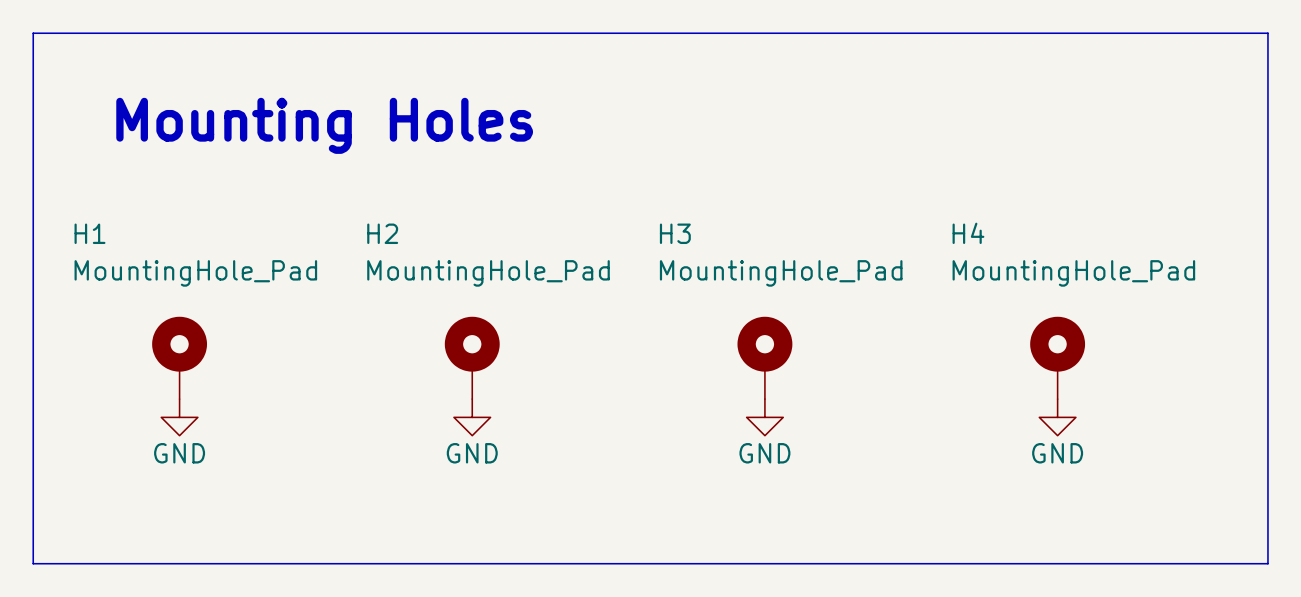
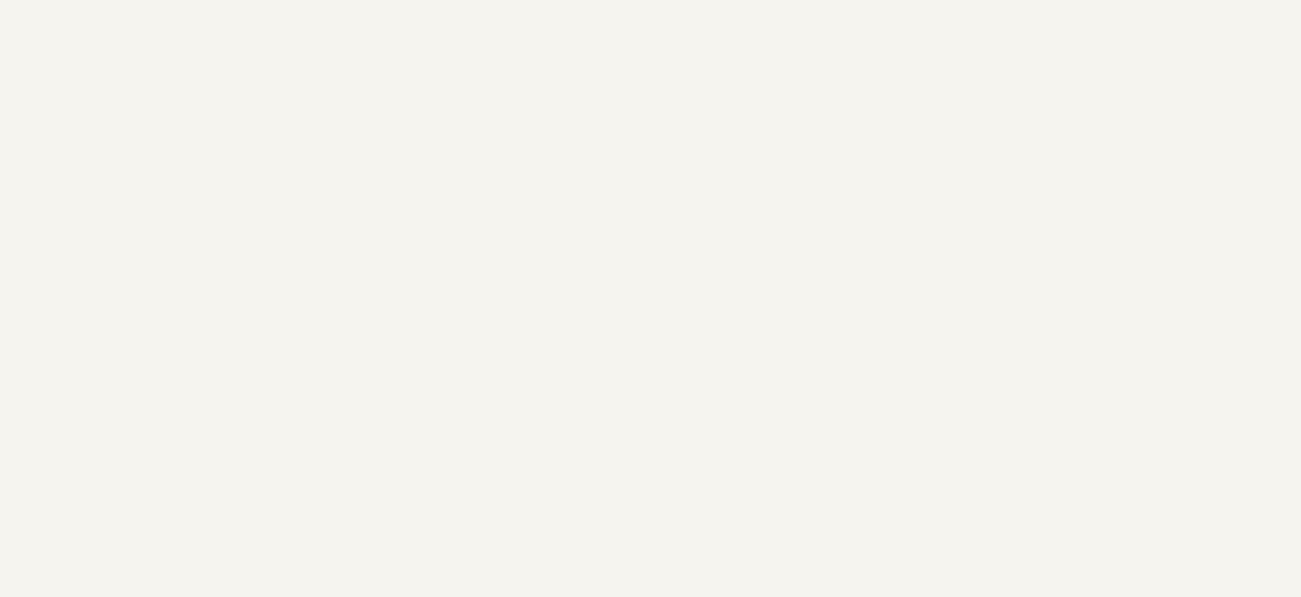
line: (33, 33) (1267, 33) (1267, 563) (33, 563) (33, 33) -> none
text: Mounting Holes (324, 125) -> none
H1: MountingHole_Pad (179, 357) -> none
H2: MountingHole_Pad (472, 357) -> none
H3: MountingHole_Pad (764, 357) -> none
H4: MountingHole_Pad (1057, 357) -> none
power symbol: GND (179, 417) -> none
power symbol: GND (472, 417) -> none
power symbol: GND (764, 417) -> none
power symbol: GND (1057, 417) -> none

